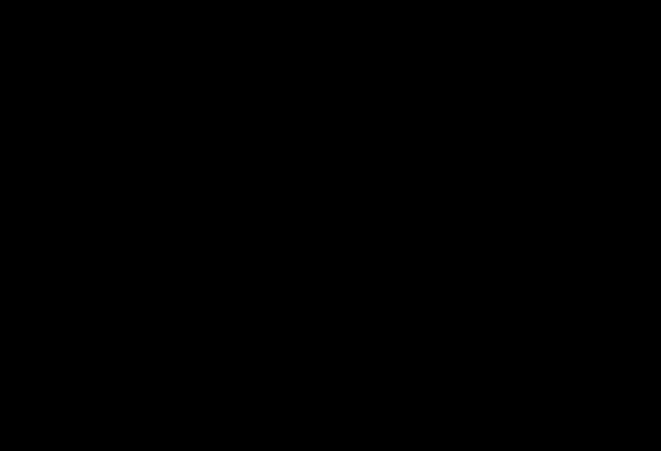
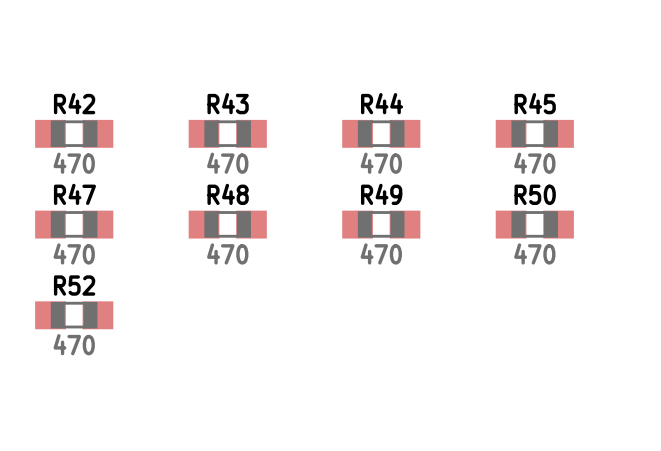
R42: none -> 470 (74, 133)
R43: none -> 470 (227, 133)
R44: none -> 470 (381, 133)
R45: none -> 470 (534, 133)
R47: none -> 470 (74, 224)
R48: none -> 470 (227, 224)
R49: none -> 470 (381, 224)
R50: none -> 470 (534, 224)
R52: none -> 470 (74, 315)

